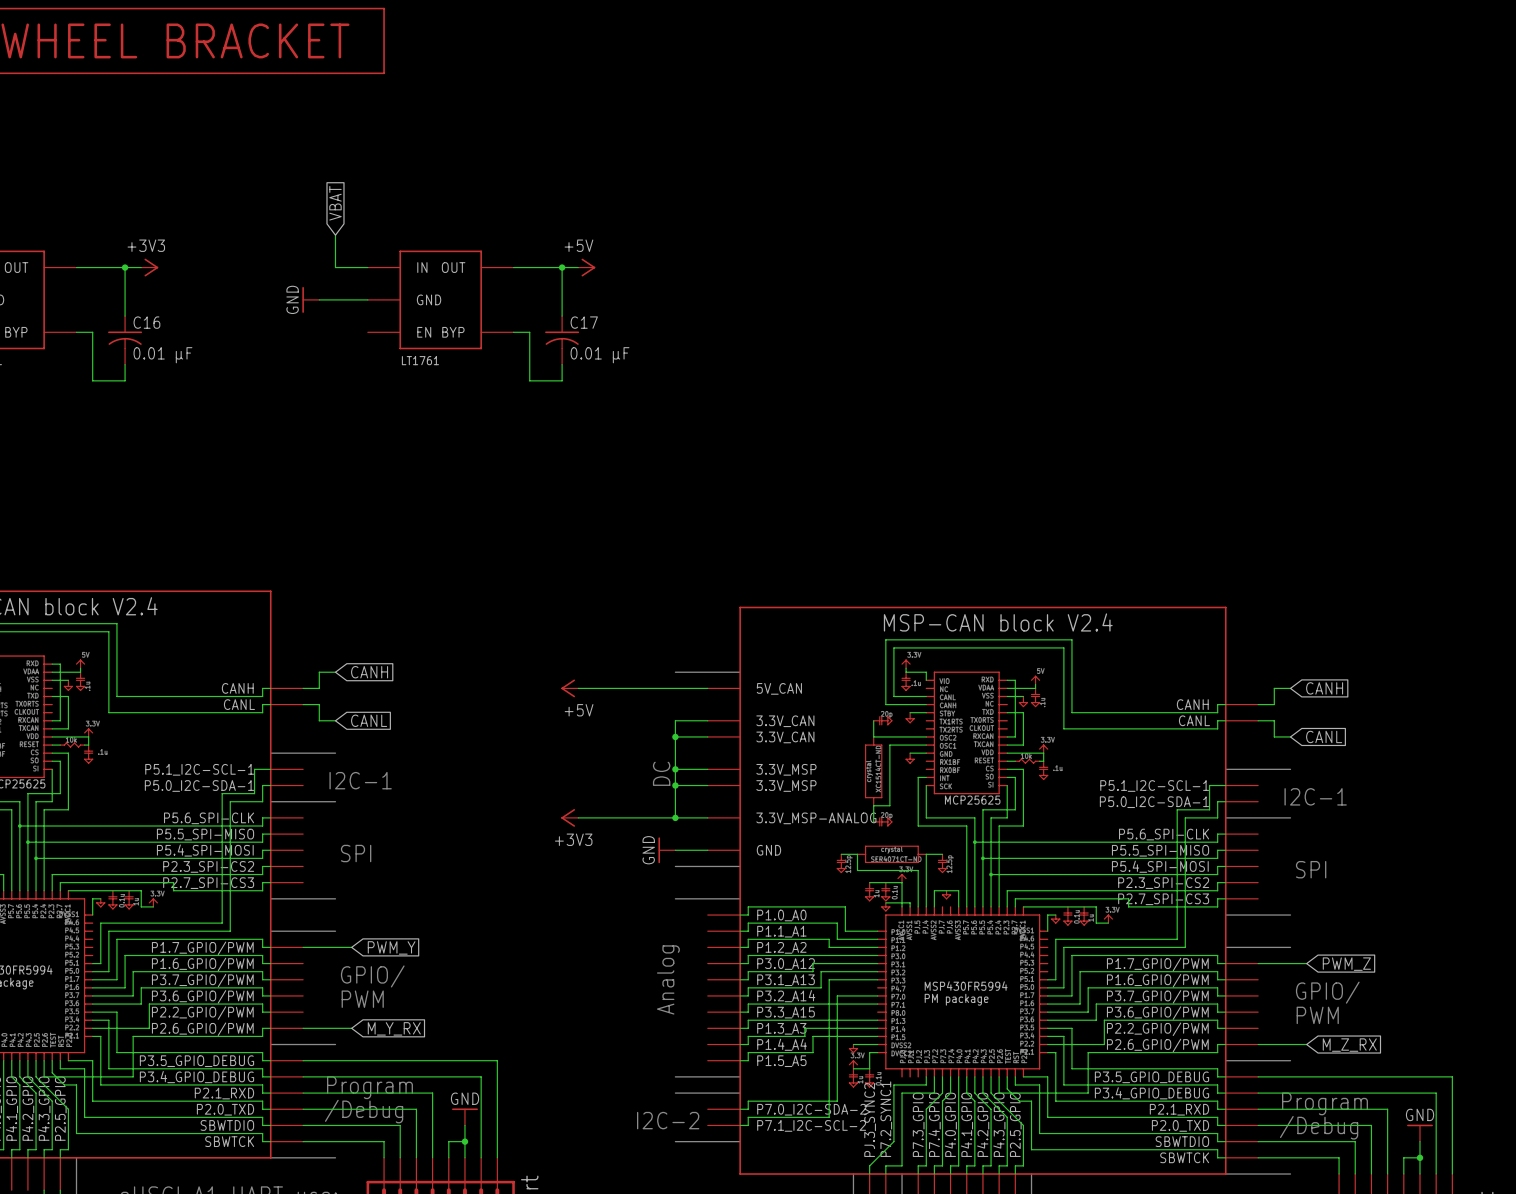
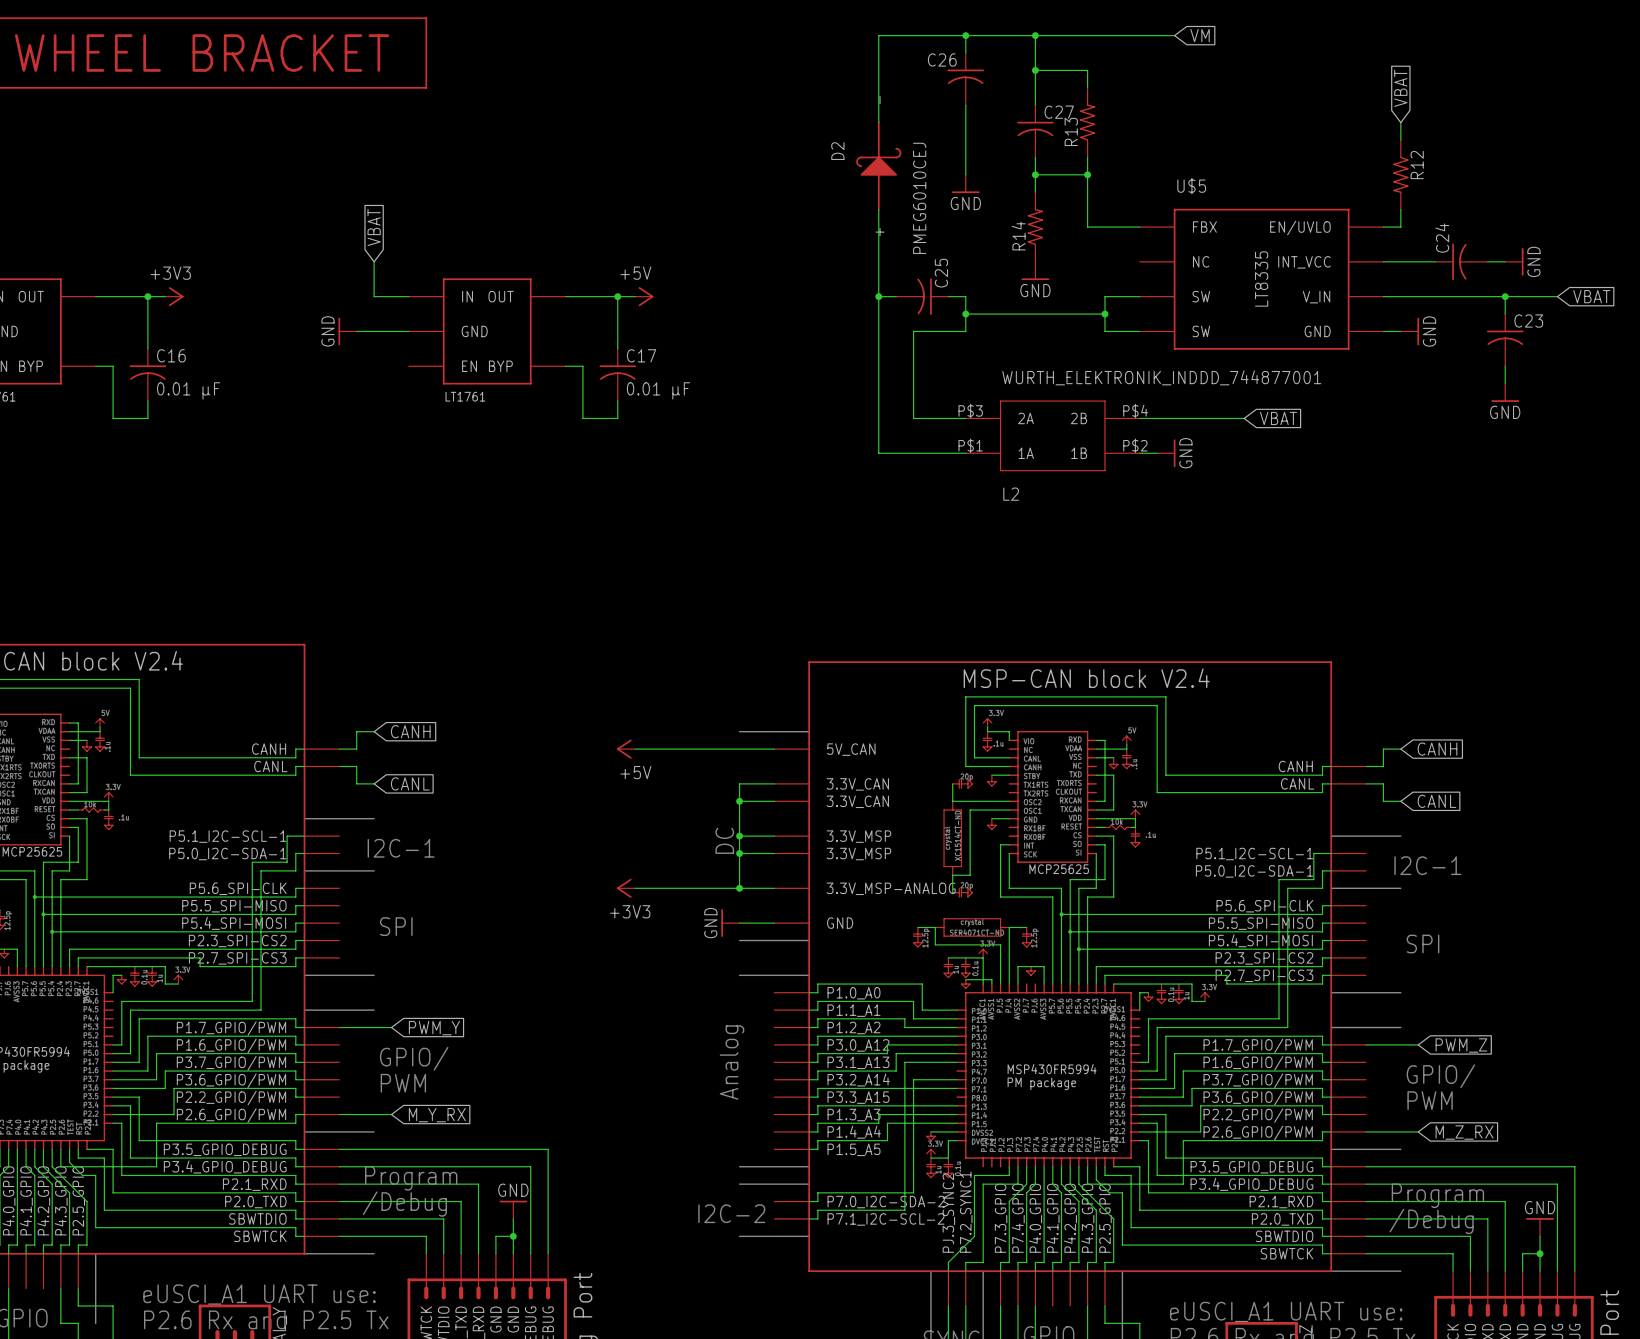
wire: none -> (965, 35) (965, 53)
junction: none -> (965, 35)
wire: none -> (1035, 35) (1035, 105)
junction: none -> (1035, 35)
wire: none -> (1174, 35) (878, 35) (878, 122)
global label: none -> VM (1200, 35)
wire: none -> (1035, 70) (1087, 70) (1087, 87)
junction: none -> (1035, 70)
C26: none -> (965, 79)
global label: none -> VBAT (1400, 88)
wire: none -> (965, 105) (965, 174)
R13: none -> (1087, 122)
wire: none -> (1400, 122) (1400, 140)
C27: none -> (1035, 131)
wire: none -> (1035, 157) (1035, 192)
wire: none -> (1087, 157) (1087, 227) (1139, 227)
D2: none -> PMEG6010CEJ (878, 166)
wire: none -> (1035, 174) (1087, 174)
junction: none -> (1035, 174)
junction: none -> (1087, 174)
R12: none -> (1400, 174)
power symbol: none -> GND (965, 183)
wire: none -> (878, 209) (878, 453) (965, 453)
wire: none -> (1400, 209) (1400, 227) (1383, 227)
R14: none -> (1035, 227)
wire: none -> (1383, 261) (1435, 261)
C24: none -> (1461, 261)
wire: none -> (1487, 261) (1505, 261)
power symbol: none -> GND (1514, 261)
power symbol: none -> GND (1035, 270)
U$5: none -> LT8335 (1261, 279)
wire: none -> (878, 296) (896, 296)
junction: none -> (878, 296)
C25: none -> (922, 296)
wire: none -> (948, 296) (965, 296) (965, 331) (913, 331) (913, 418) (965, 418)
wire: none -> (1139, 296) (1104, 296) (1104, 331) (1139, 331)
wire: none -> (1383, 296) (1557, 296)
wire: none -> (1505, 296) (1505, 314)
junction: none -> (1505, 296)
global label: none -> VBAT (1591, 296)
wire: none -> (965, 314) (1104, 314)
junction: none -> (965, 314)
junction: none -> (1104, 314)
wire: none -> (1383, 331) (1400, 331)
power symbol: none -> GND (1409, 331)
C23: none -> (1505, 340)
wire: none -> (1505, 366) (1505, 383)
power symbol: none -> GND (1505, 392)
wire: none -> (1139, 418) (1244, 418)
global label: none -> VBAT (1278, 418)
L2: none -> WURTH_ELEKTRONIK_INDDD_744877001 (1052, 435)
wire: none -> (1139, 453) (1157, 453)
power symbol: none -> GND (1166, 453)

